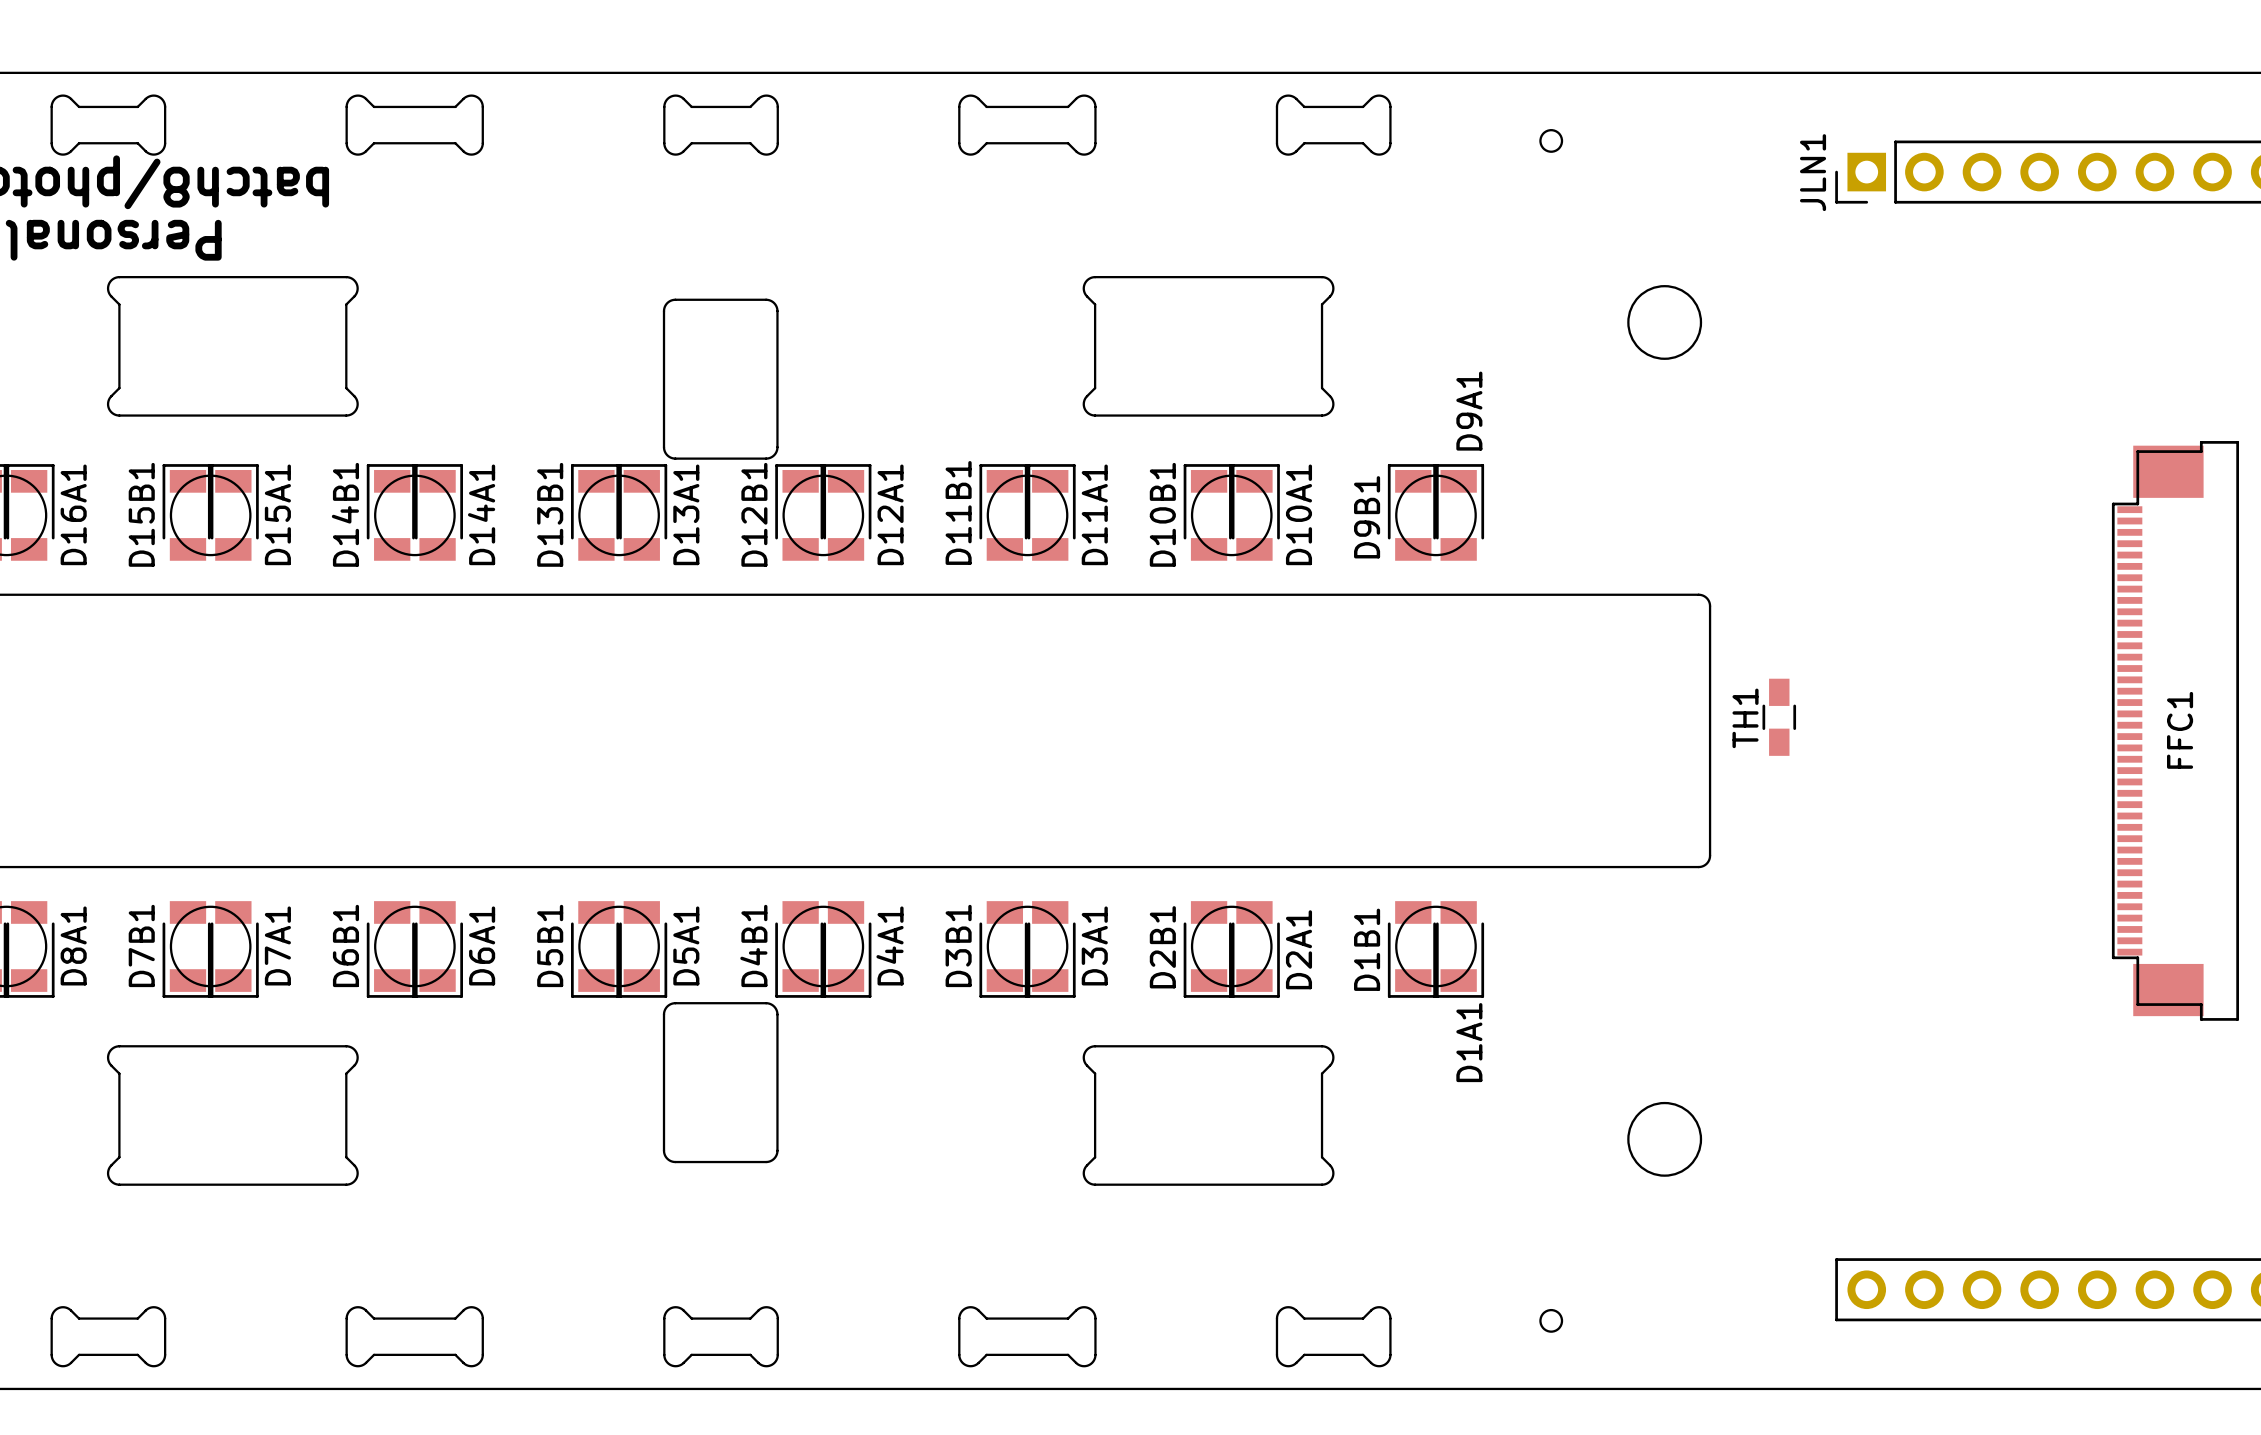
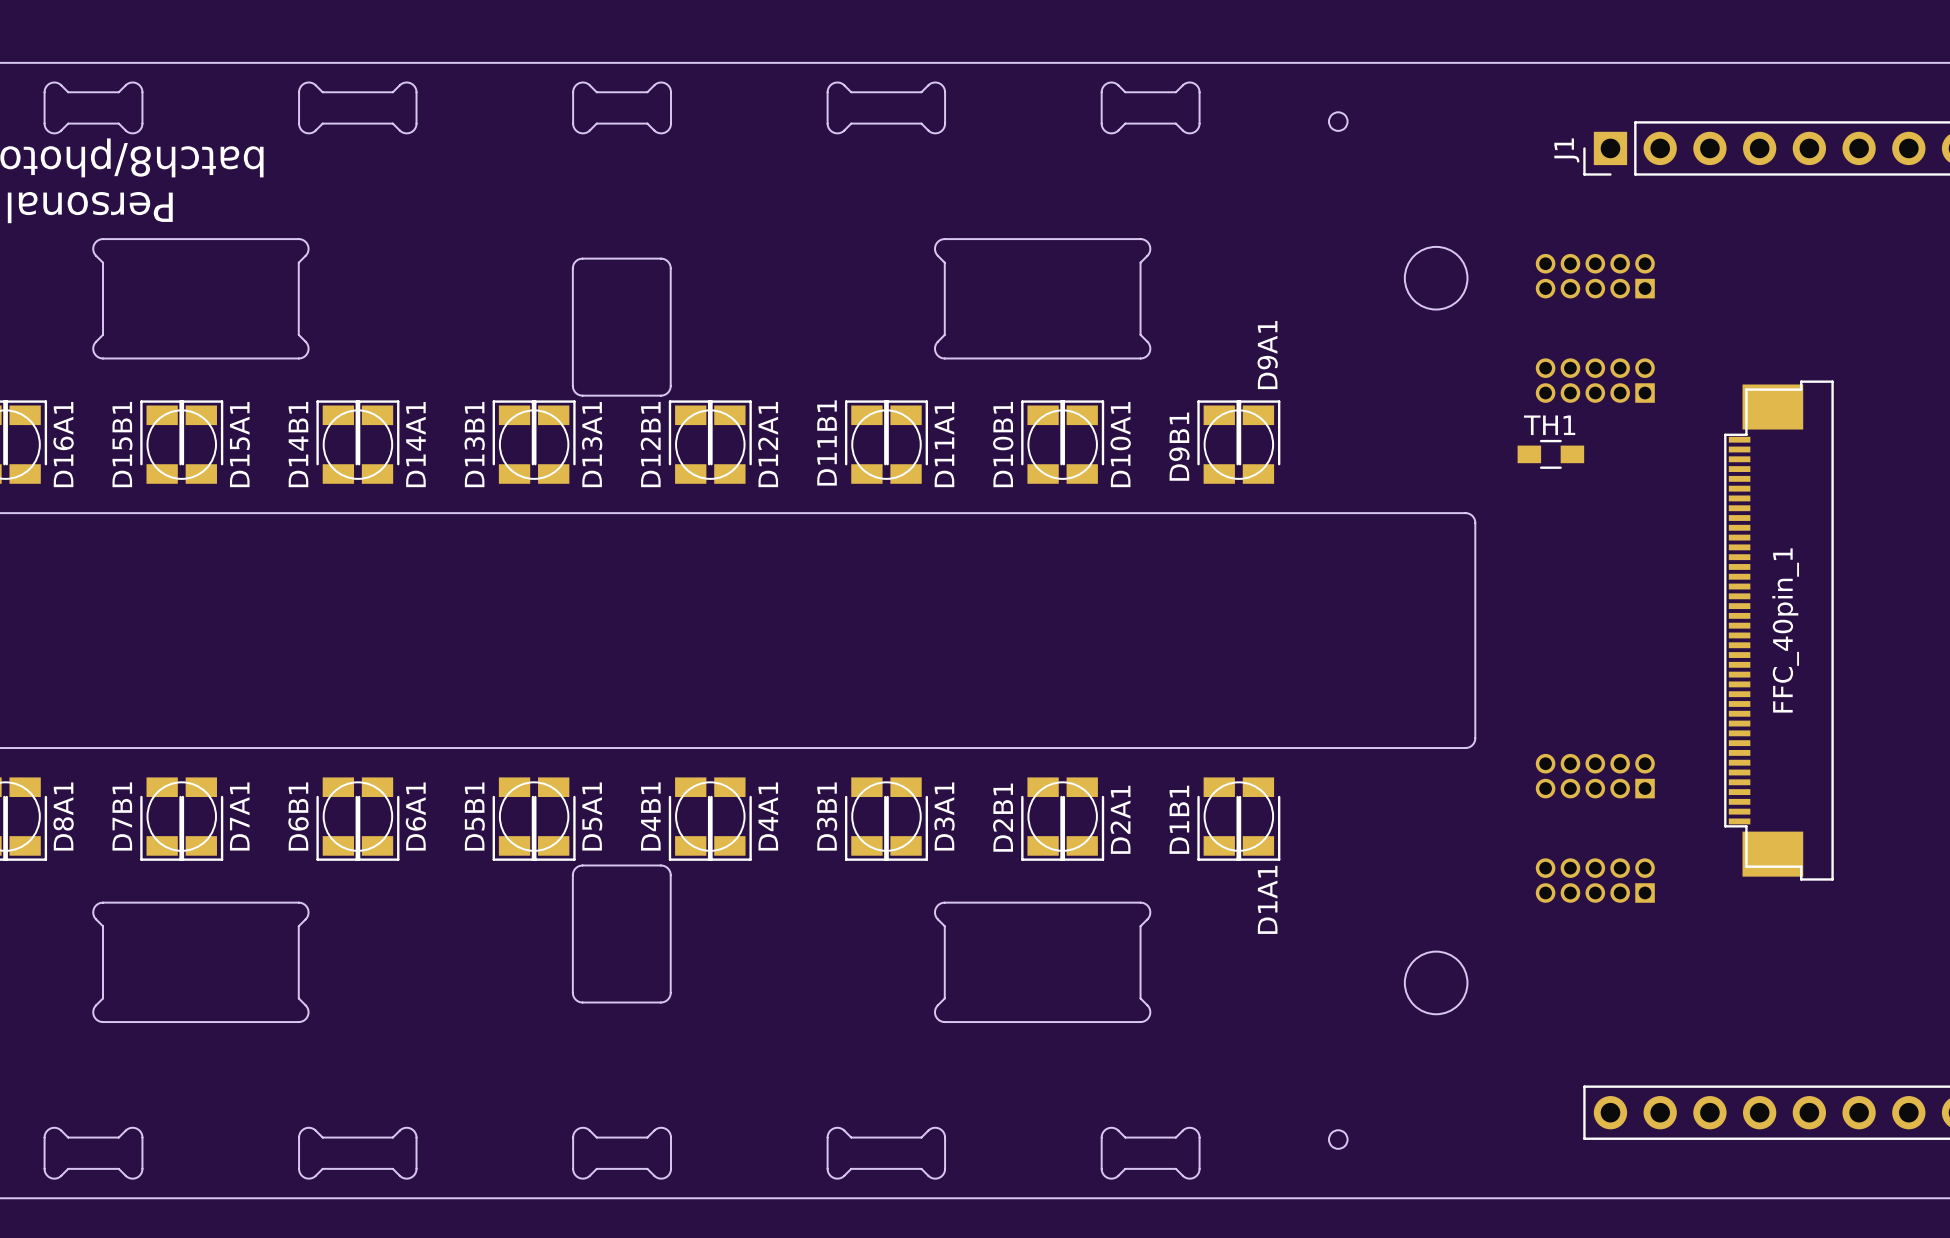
JLN1 name: JLN1 (1813, 172) -> J1 (1566, 150)
part: none -> (1595, 276)
part: none -> (1595, 380)
TH1 rotation: 0° (1779, 717) -> 90° clockwise (1550, 454)
TH1 position: (1779, 717) -> (1550, 454)
FFC_40pin_1: none -> (1778, 630)
FFC1: (2175, 730) -> none
part: none -> (1595, 776)
part: none -> (1595, 880)

